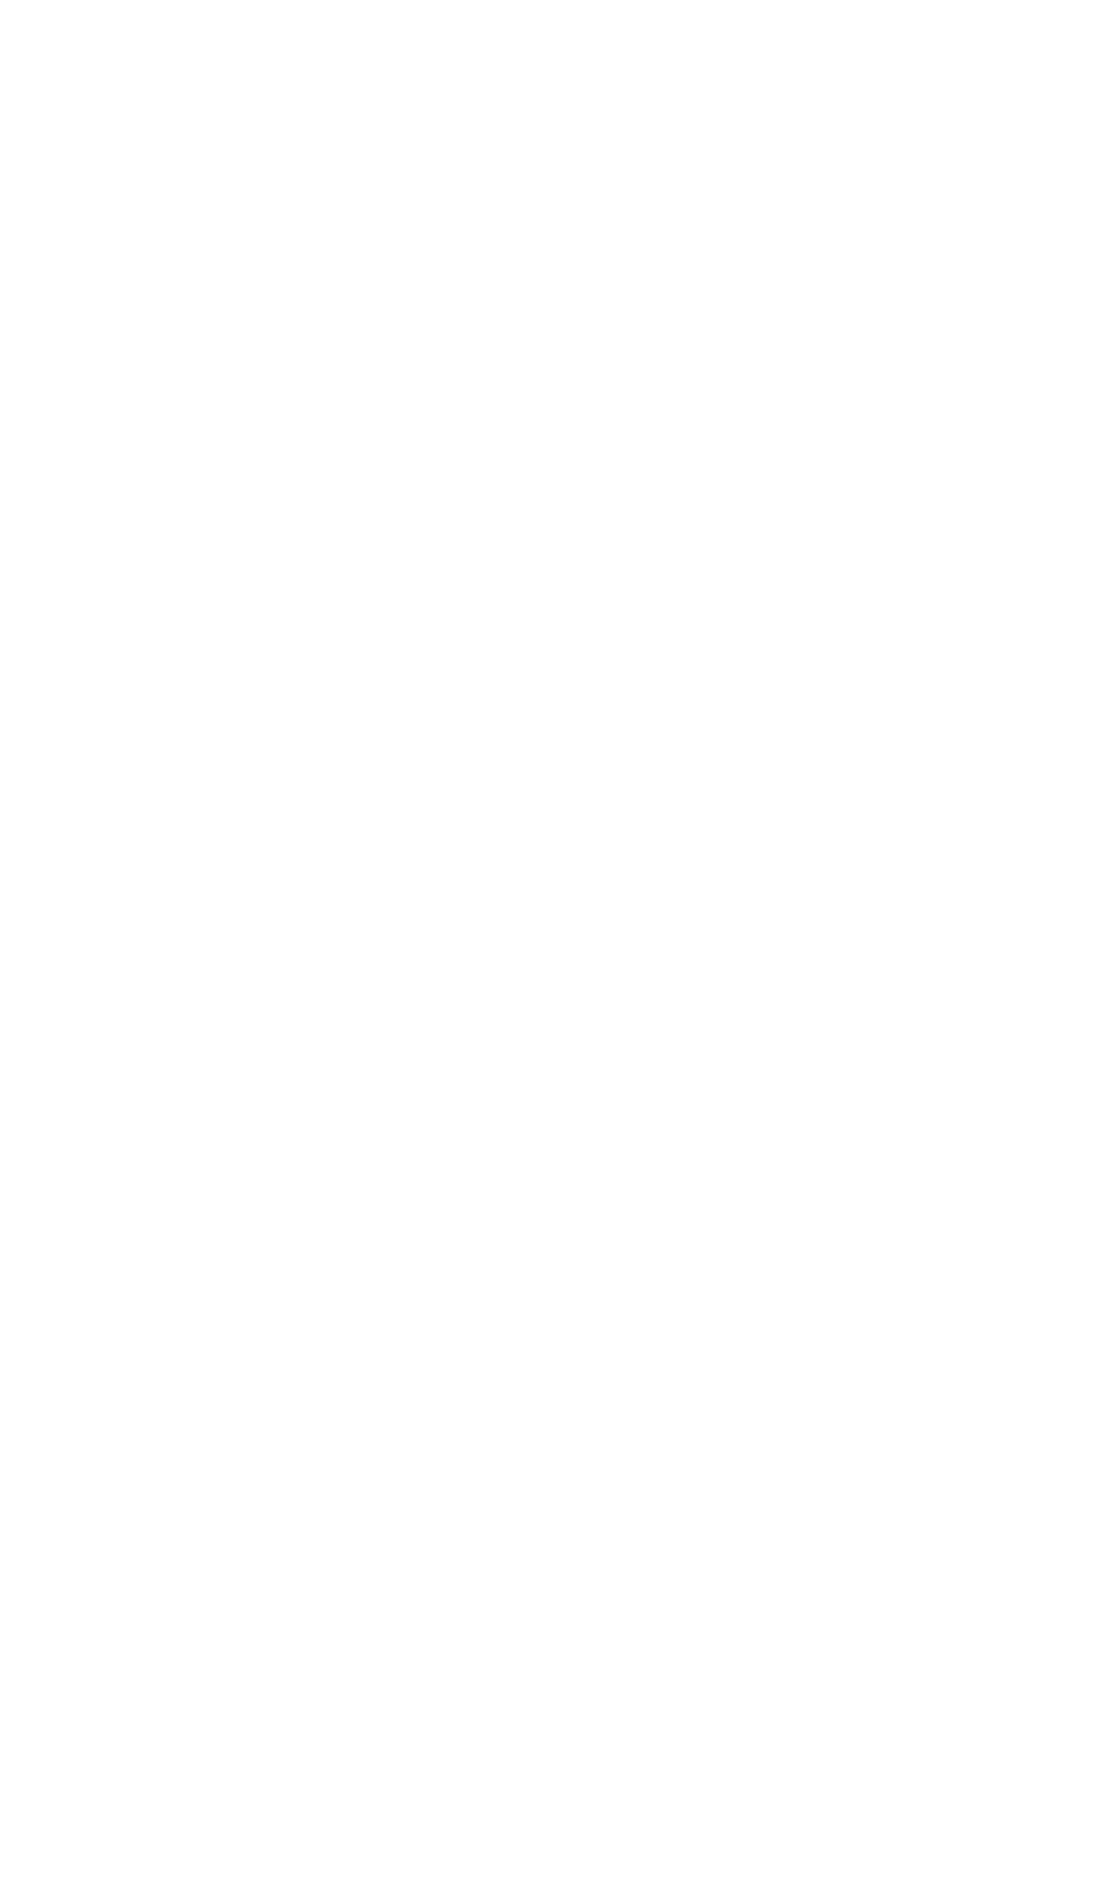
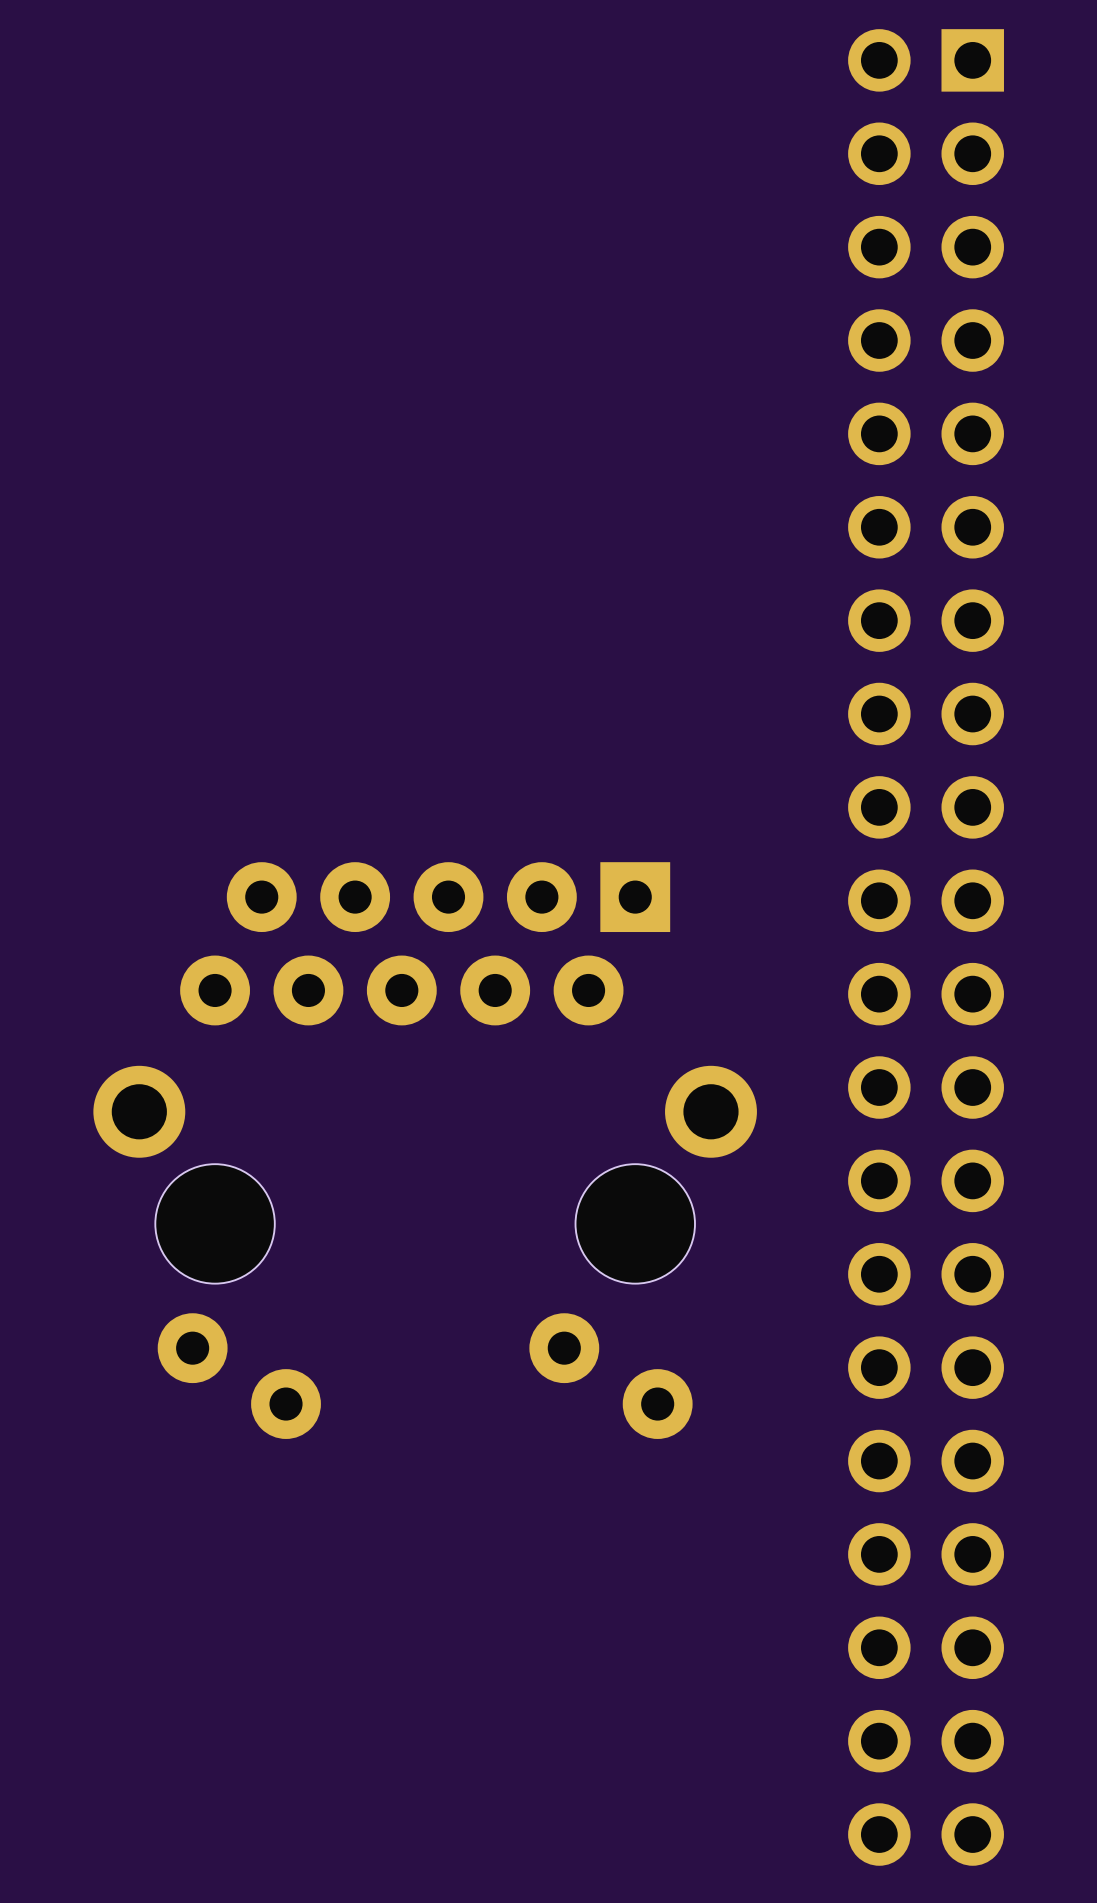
part: none -> (926, 947)
part: none -> (425, 1150)

